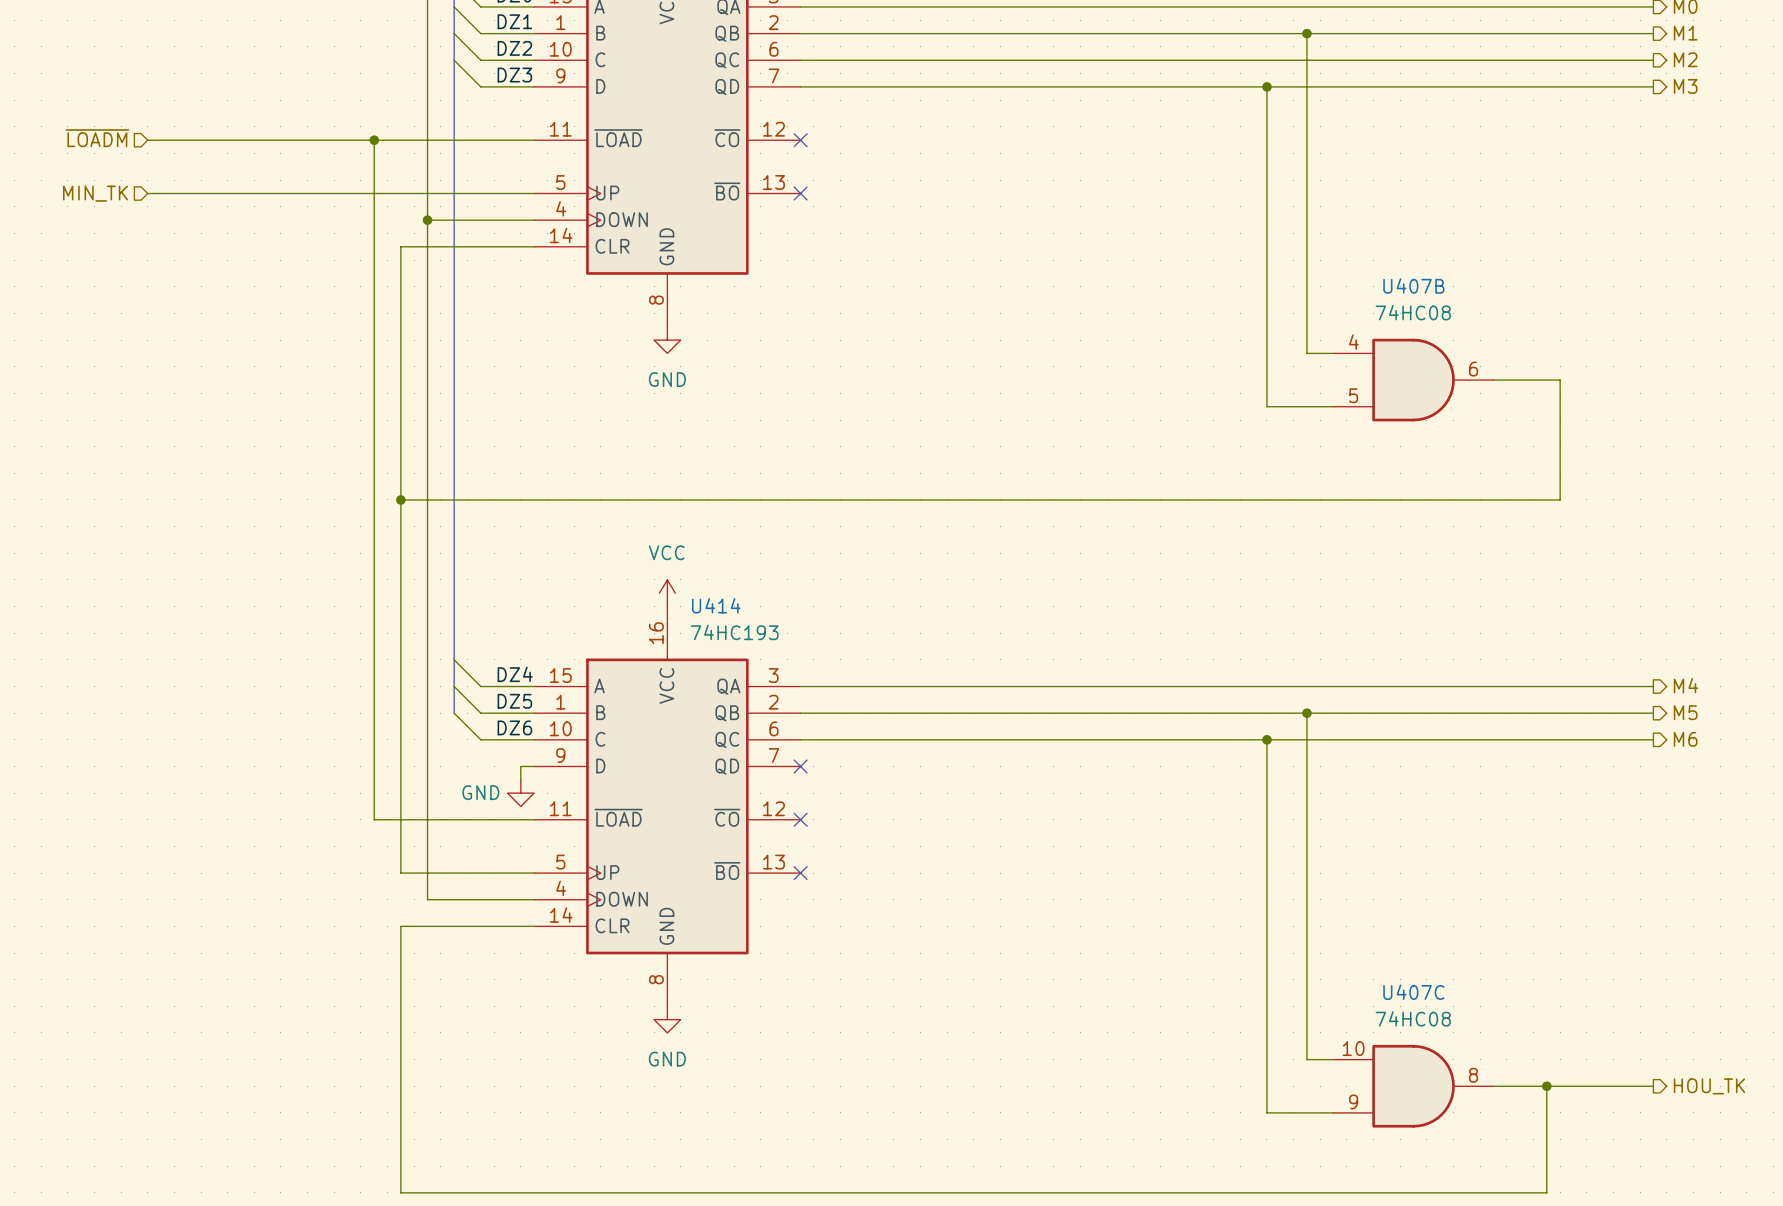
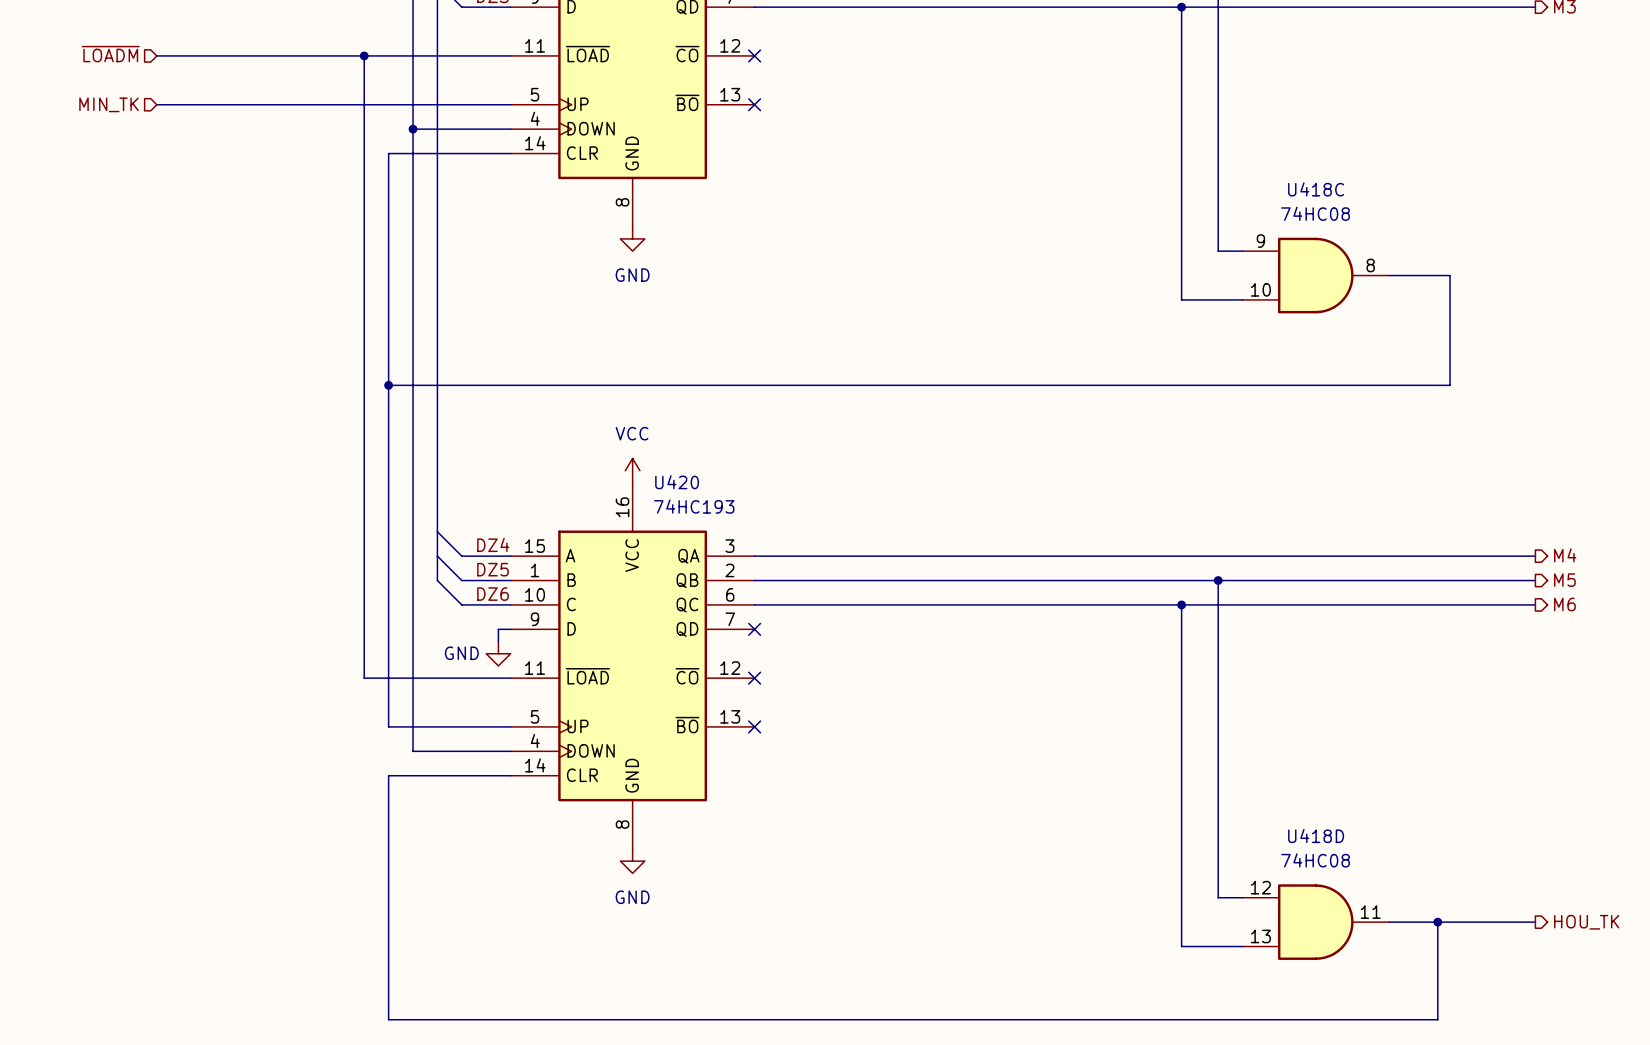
U407B name: U407B (1413, 285) -> U418C (1316, 189)
U407B pin number: 4 (1353, 342) -> 9 (1260, 241)
U407B pin number: 6 (1473, 369) -> 8 (1370, 265)
U407B pin number: 5 (1353, 395) -> 10 (1260, 289)
U414 name: U414 (716, 605) -> U420 (677, 482)
U407C name: U407C (1413, 992) -> U418D (1316, 835)
U407C pin number: 10 (1353, 1048) -> 12 (1260, 887)
U407C pin number: 8 (1473, 1075) -> 11 (1370, 912)
U407C pin number: 9 (1353, 1101) -> 13 (1260, 936)

